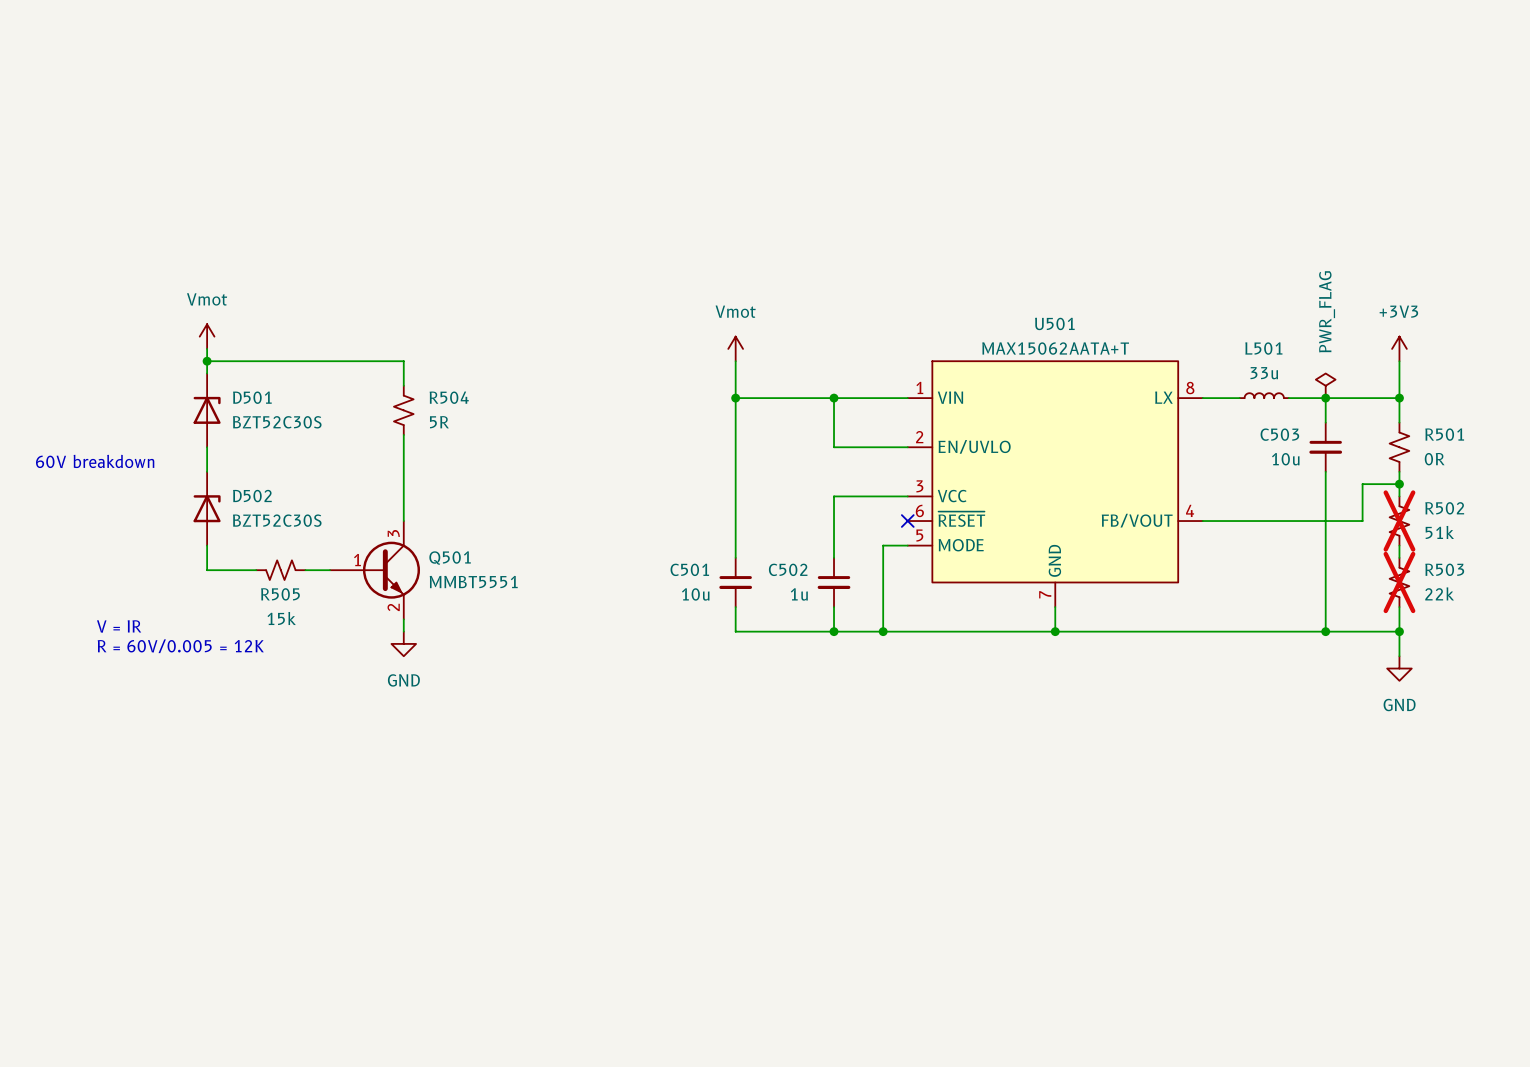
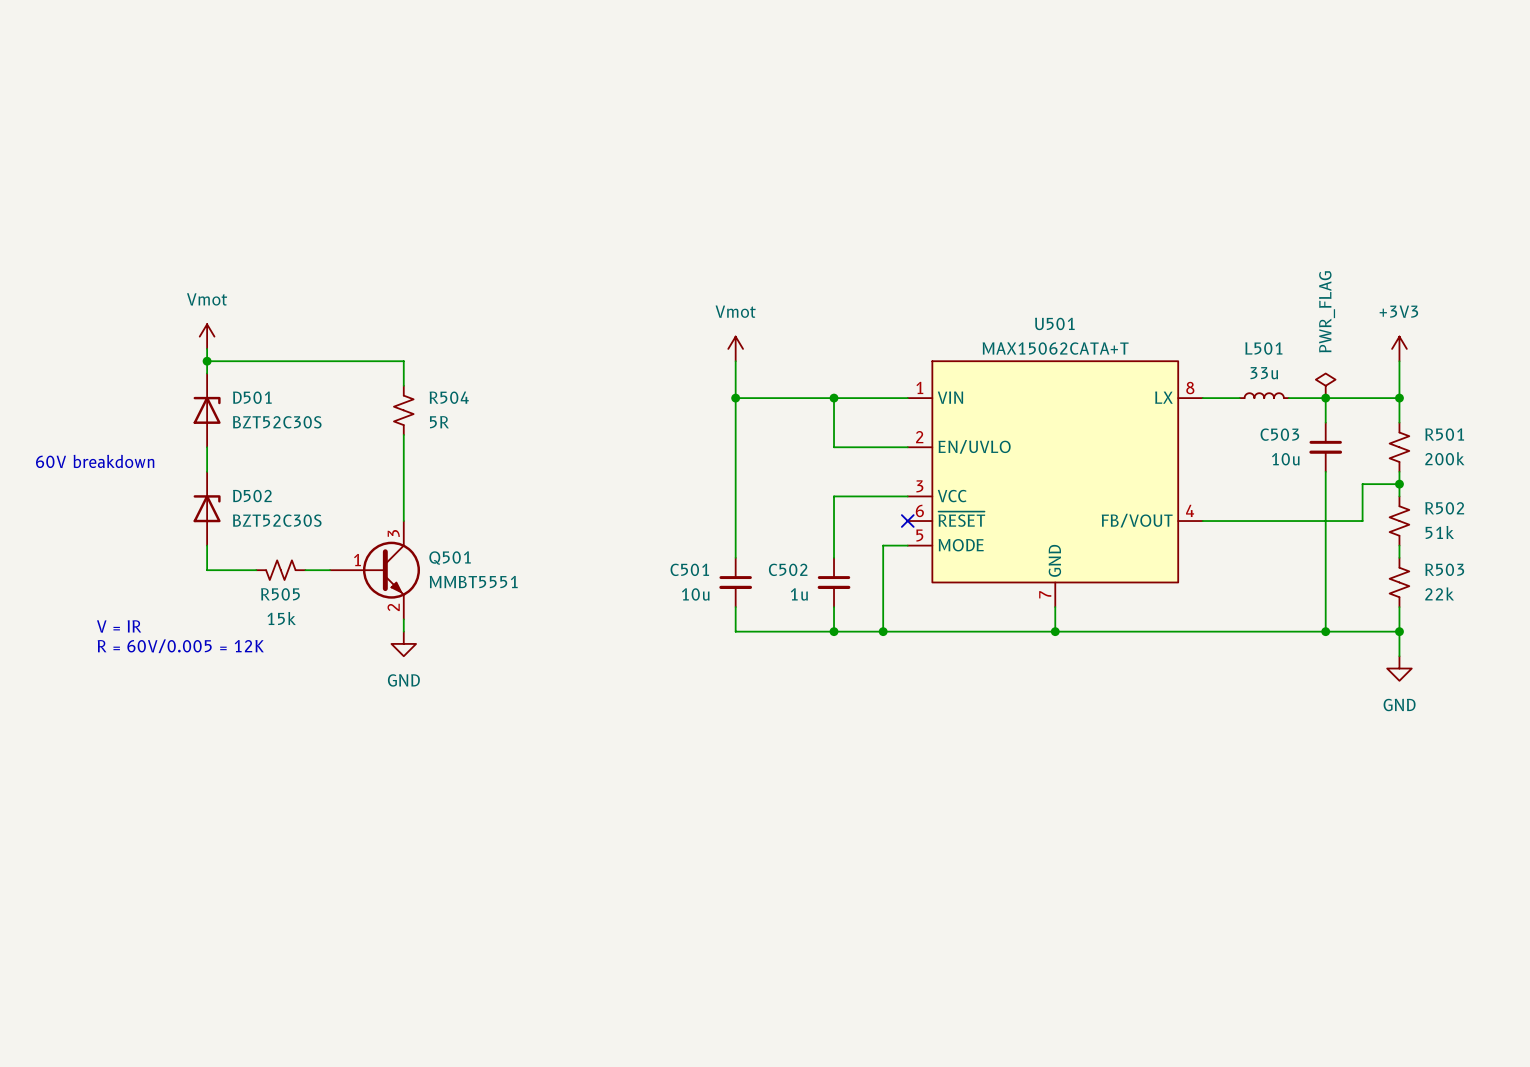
U501 value: MAX15062AATA+T (1055, 348) -> MAX15062CATA+T (1055, 348)
R501 value: 0R (1434, 459) -> 200k (1444, 458)
R502 do-not-place cross: (1399, 521) -> none
R503 do-not-place cross: (1399, 582) -> none

